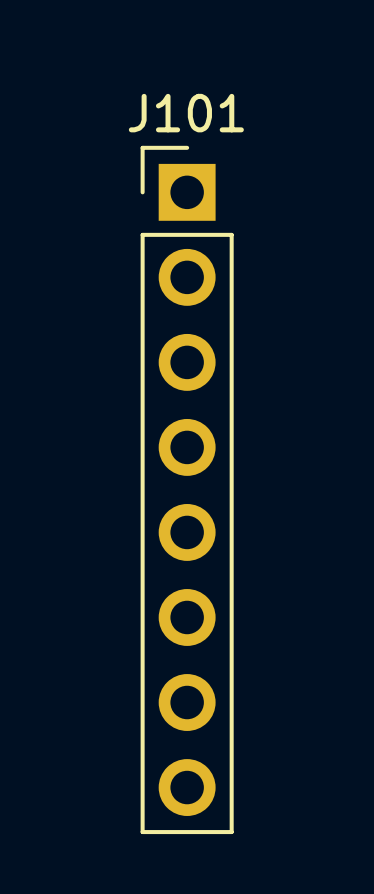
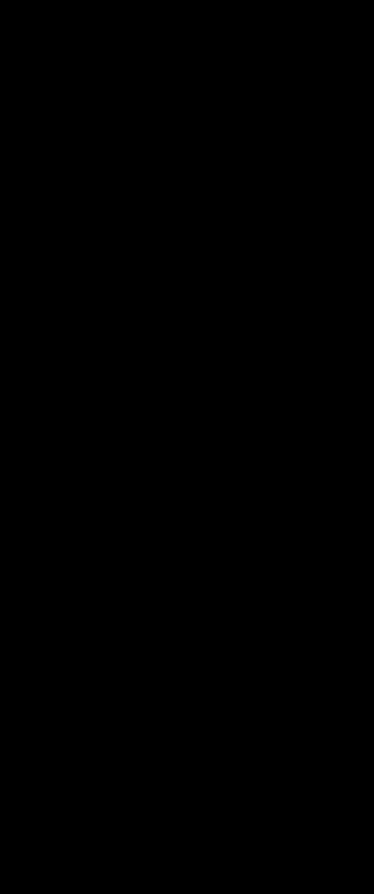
J101: (187, 489) -> none

